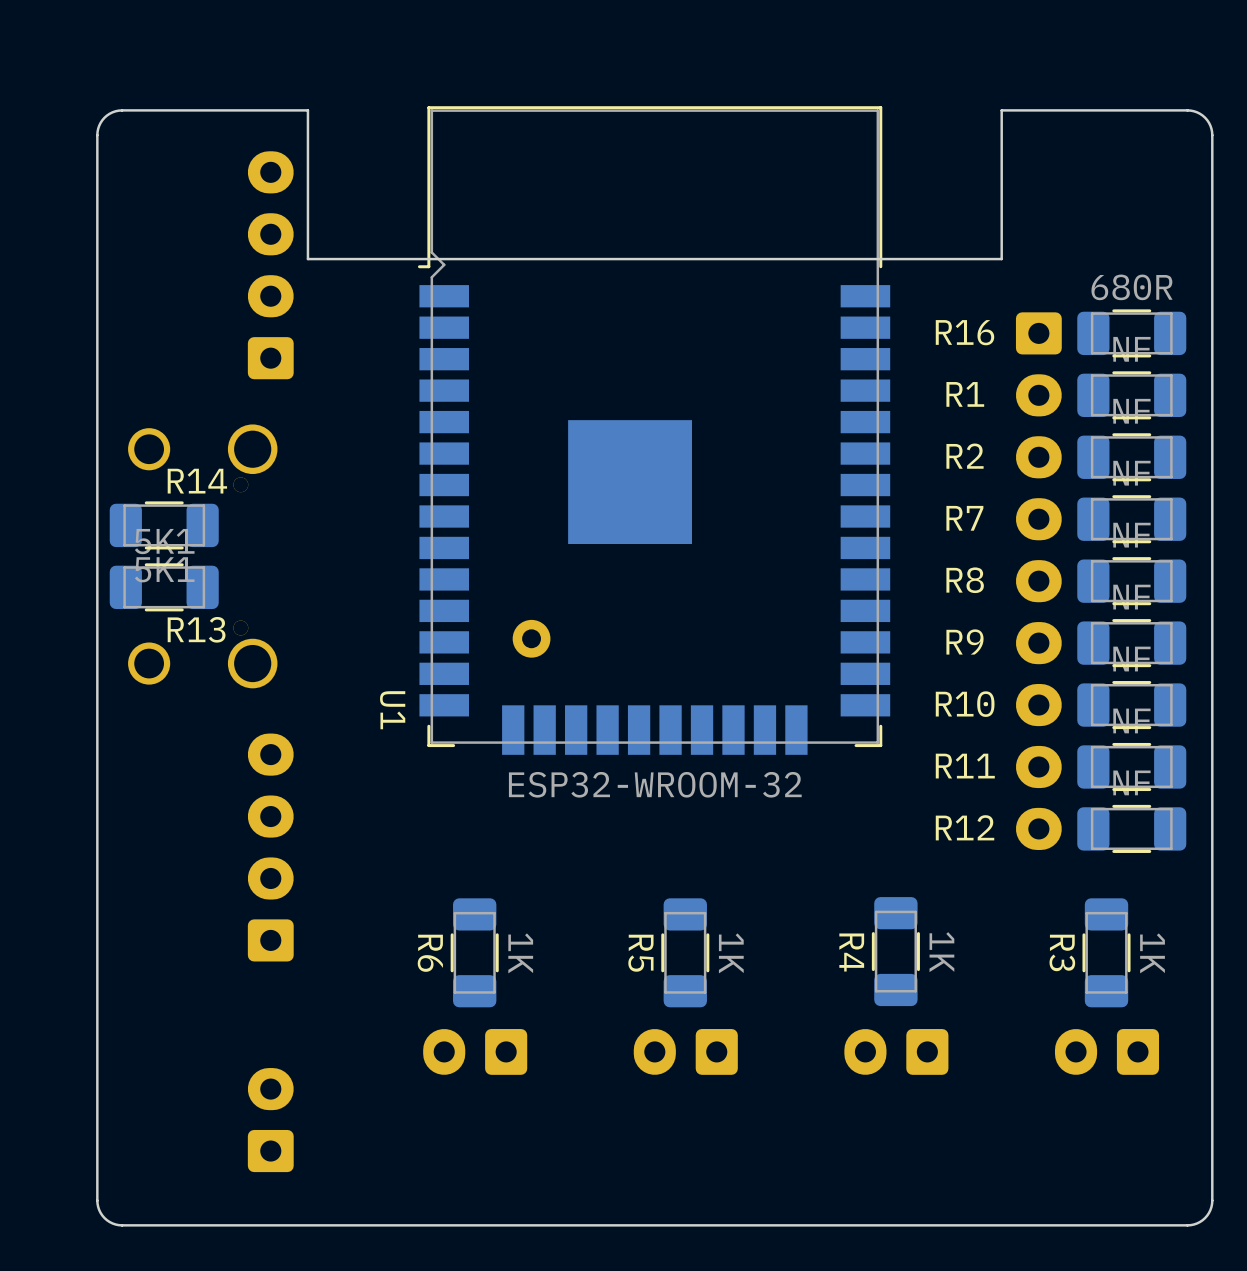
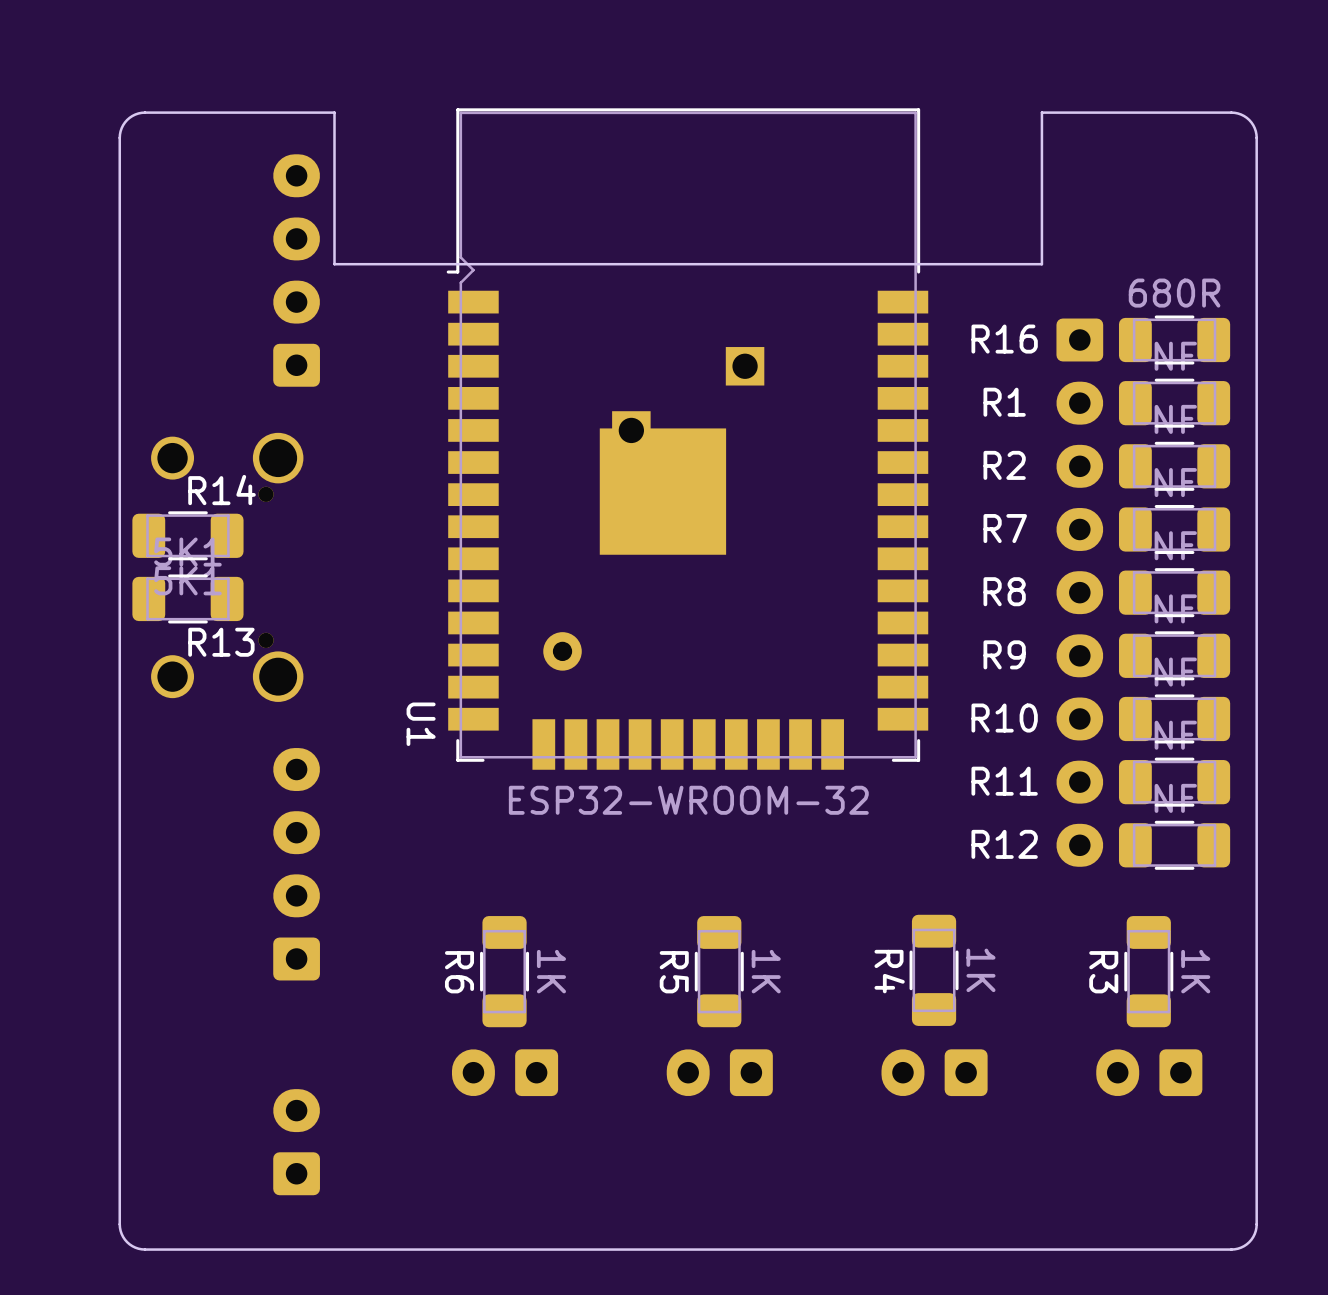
part: none -> (745, 366)
part: none -> (631, 430)

